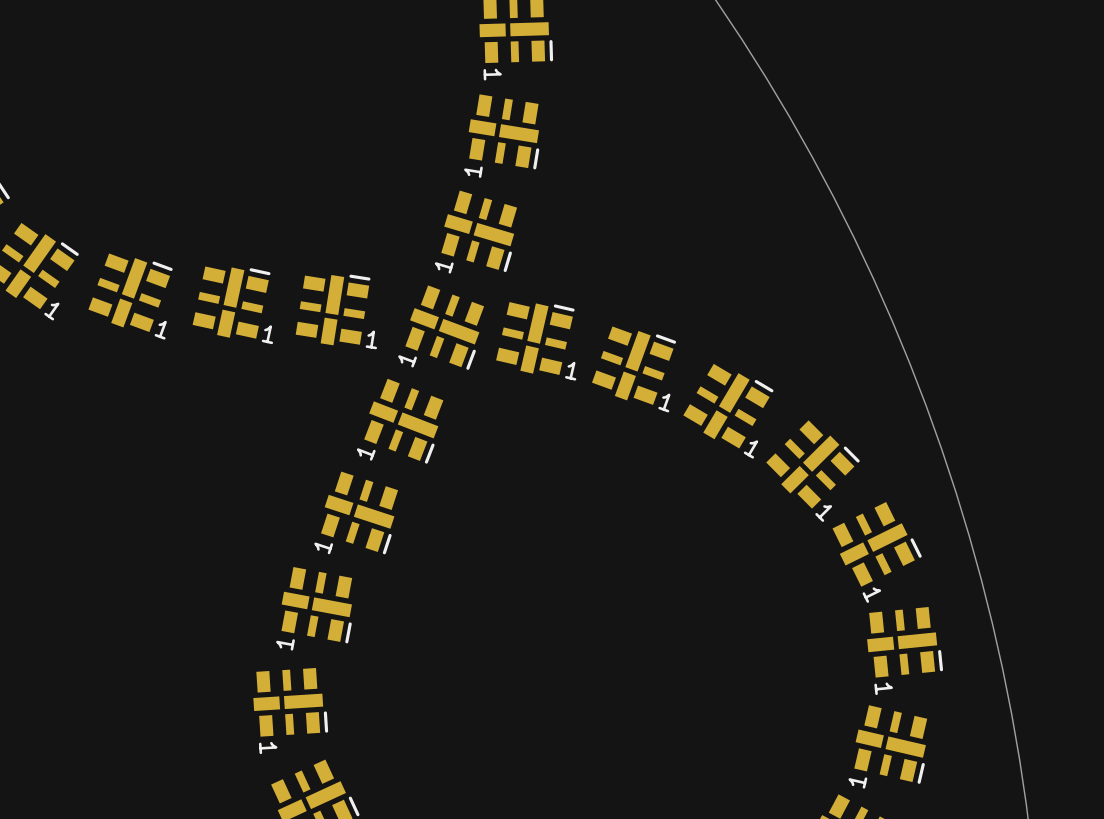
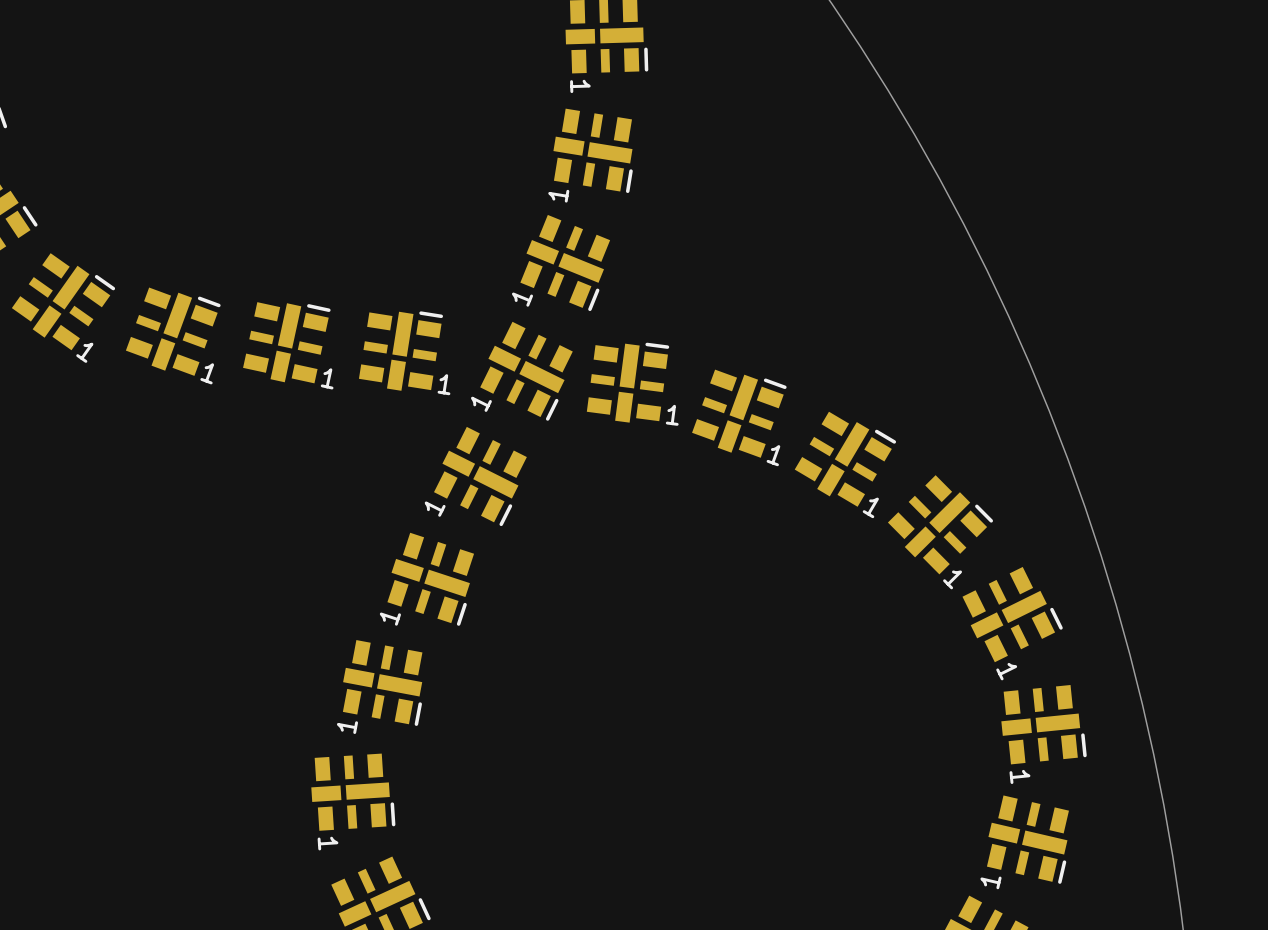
part rotation: 0° (479, 231) -> 5.6° clockwise (565, 262)
part rotation: 0° (444, 327) -> 5.7° clockwise (526, 371)
part rotation: 0° (535, 338) -> 5.6° counterclockwise (628, 382)
part rotation: 0° (403, 421) -> 5.5° clockwise (480, 476)

